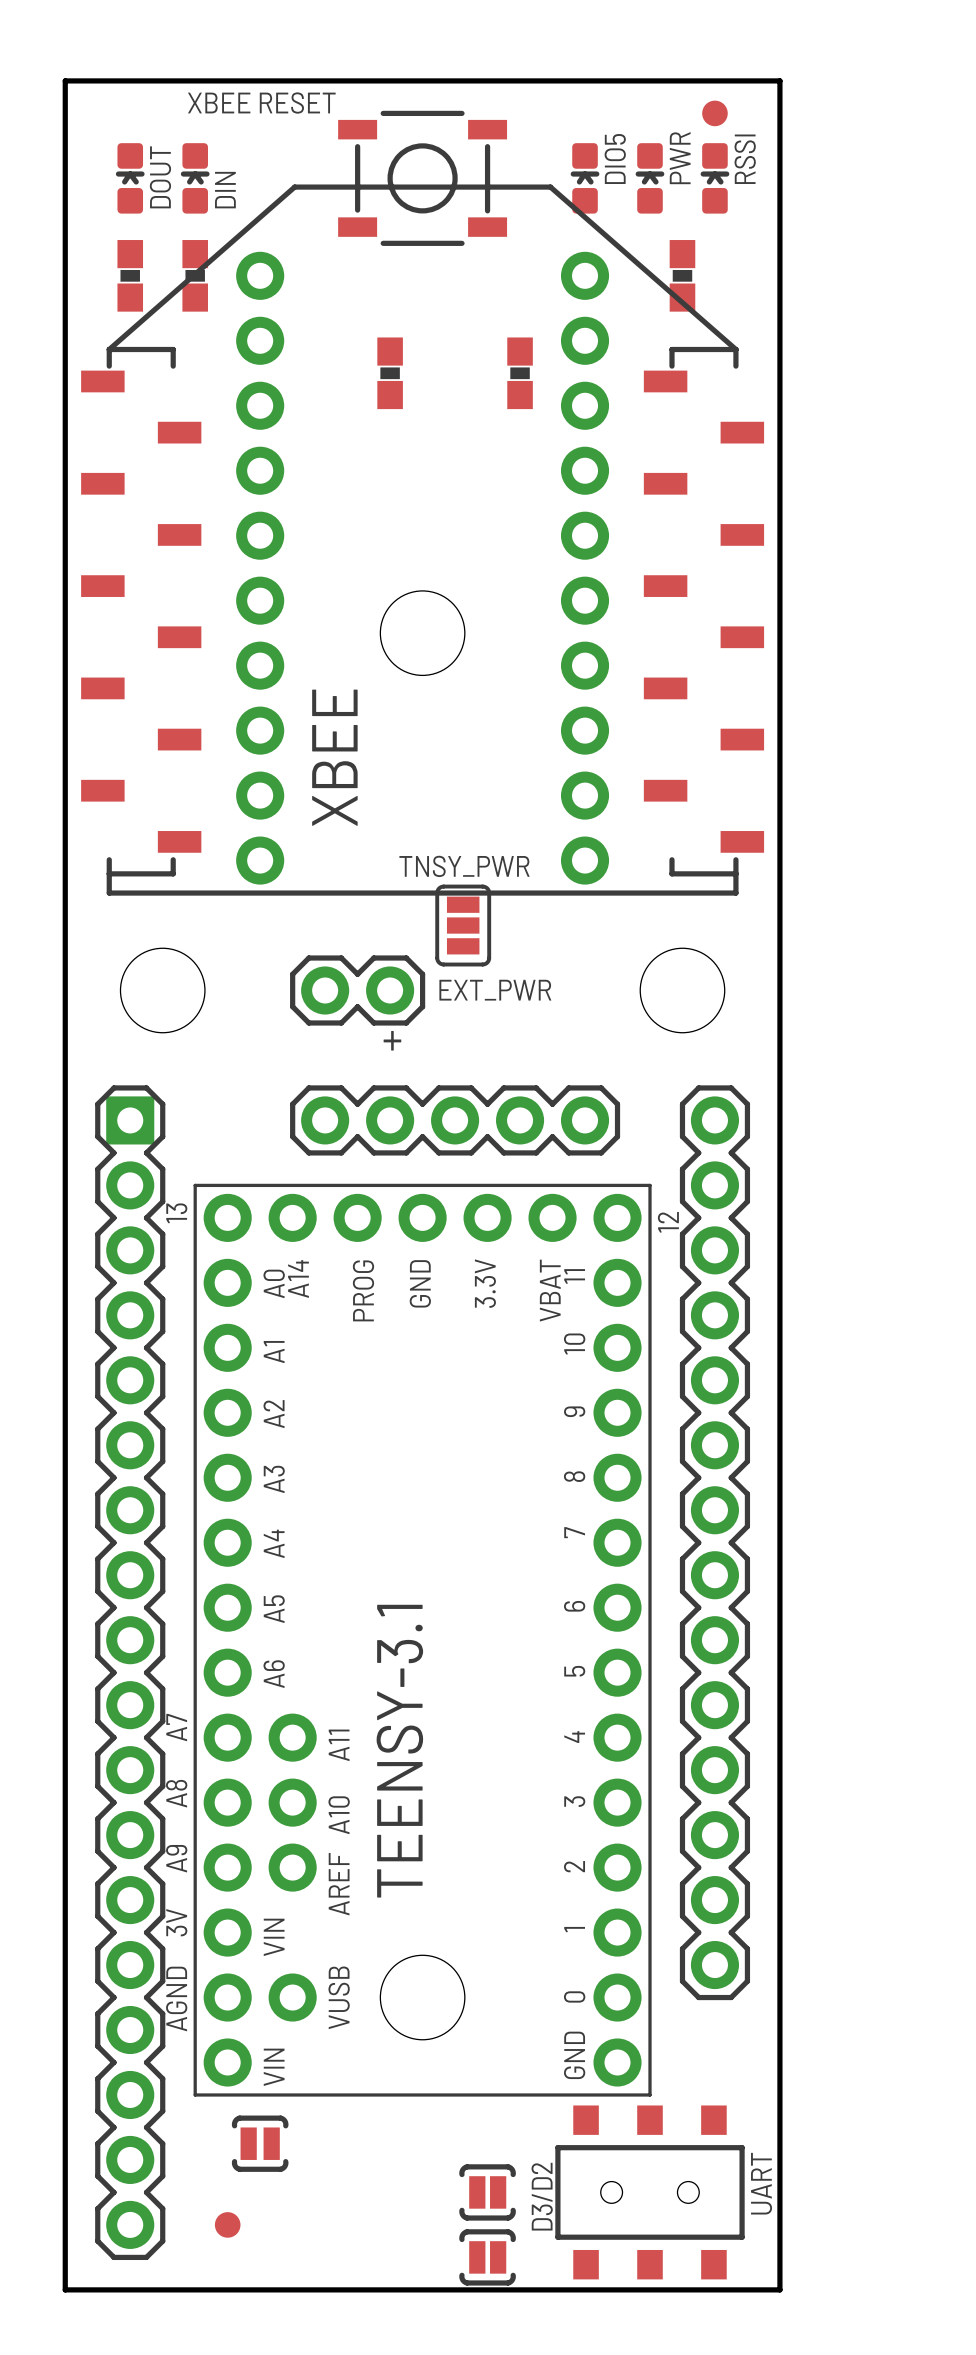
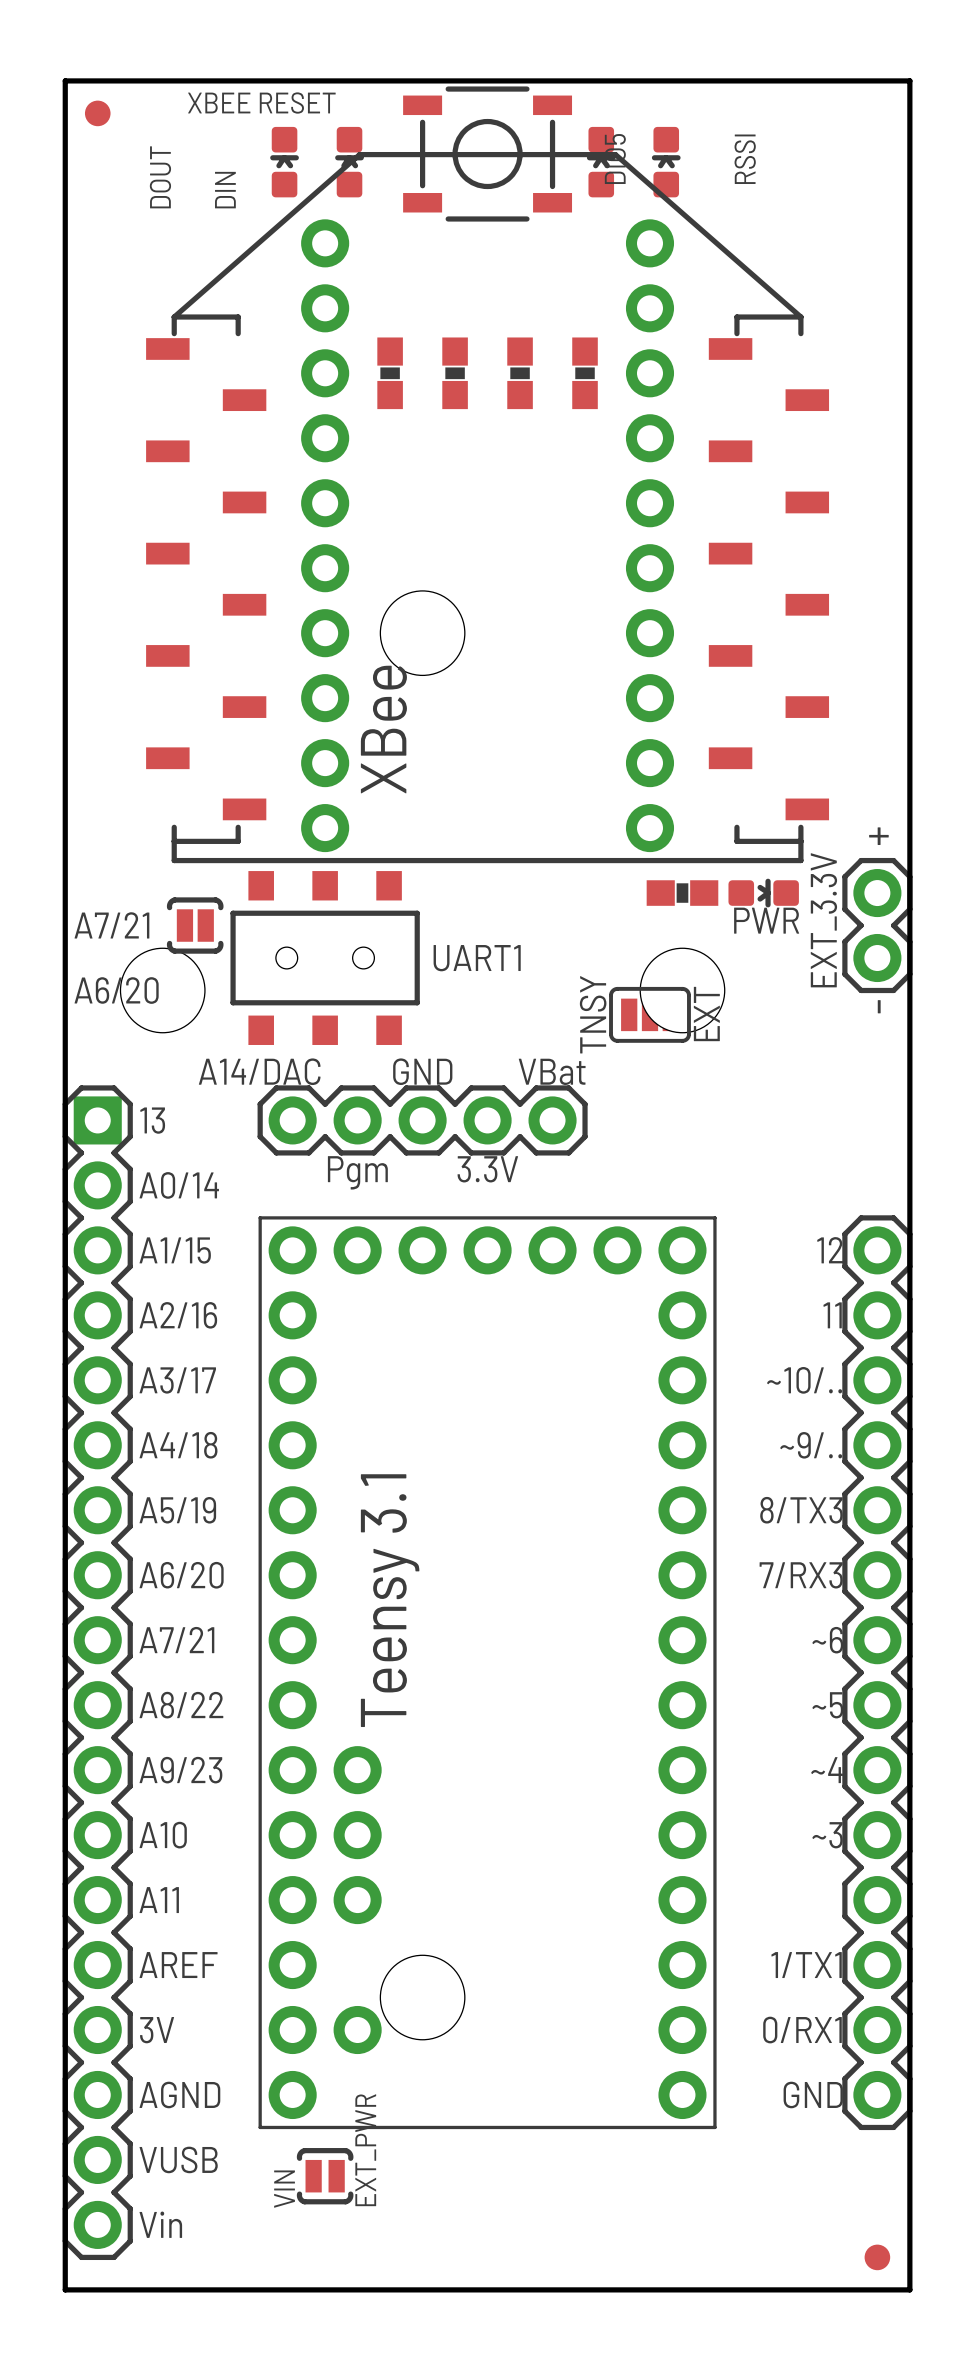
board edge: (779, 80) (779, 2289) -> (779, 80) (909, 80) (909, 2289) (779, 2289)
part position: (714, 113) -> (97, 113)
text: PWR (680, 158) -> none
part: none -> (284, 162)
part: none -> (349, 162)
part: (130, 178) -> none
part: (195, 178) -> none
part position: (422, 178) -> (487, 154)
part position: (585, 178) -> (601, 162)
part position: (649, 178) -> (666, 162)
part: (714, 178) -> none
part: (130, 275) -> none
part: (195, 275) -> none
part: (682, 275) -> none
part: none -> (455, 373)
part: none -> (585, 373)
part position: (422, 540) -> (487, 507)
part position: (260, 568) -> (325, 535)
part position: (585, 568) -> (649, 535)
text: none -> XBee (383, 729)
text: XBEE (334, 757) -> none
text: TNSY_PWR (464, 866) -> none
part: none -> (682, 893)
part: none -> (763, 893)
text: none -> PWR (766, 920)
text: none -> A7/21 (111, 925)
part: none -> (195, 925)
part rotation: 0° (463, 925) -> 90° clockwise (649, 1014)
part position: (463, 925) -> (649, 1014)
EXT_3.3V: none -> (877, 925)
part: none -> (325, 958)
text: none -> UART1 (477, 958)
text: none -> A6/20 (116, 990)
EXT_PWR: (357, 990) -> none
text: none -> - (879, 1006)
text: none -> TNSY (593, 1014)
text: none -> EXT (706, 1014)
text rotation: 0° (392, 1040) -> 90° counterclockwise (878, 836)
text position: + (392, 1040) -> + (878, 836)
text: none -> A14/DAC (259, 1071)
text: none -> GND (422, 1071)
text: none -> VBat (552, 1071)
text: none -> 13 (152, 1120)
part position: (455, 1120) -> (422, 1120)
text: none -> 3.3V (487, 1169)
text: none -> Pgm (357, 1172)
text: none -> A0/14 (179, 1185)
text: none -> A1/15 (175, 1250)
text: none -> 12 (830, 1250)
text: none -> A2/16 (178, 1315)
text: none -> 11 (832, 1315)
text: none -> A3/17 (177, 1380)
text: none -> ~10/.. (804, 1380)
text: none -> A4/18 (178, 1445)
text: none -> ~9/.. (811, 1445)
text: none -> A5/19 (177, 1510)
text: none -> 8/TX3 (801, 1510)
part position: (714, 1542) -> (877, 1672)
text: none -> A6/20 (181, 1575)
text: none -> 7/RX3 (801, 1575)
text: none -> Teensy 3.1 (390, 1600)
text: none -> A7/21 (176, 1640)
part: TEENSY-3.1 (422, 1640) -> none
text: none -> ~6 (827, 1640)
part position: (130, 1672) -> (97, 1672)
part: none -> (487, 1672)
text: none -> A8/22 (181, 1705)
text: none -> ~5 (827, 1705)
text: none -> A9/23 (180, 1770)
text: none -> ~4 (826, 1770)
text: none -> A10 (163, 1835)
text: none -> ~3 (827, 1835)
text: none -> A11 (159, 1900)
text: none -> AREF (178, 1965)
text: none -> 1/TX1 (806, 1965)
text: none -> 3V (157, 2030)
text: none -> 0/RX1 (802, 2030)
text: none -> AGND (179, 2094)
text: none -> GND (813, 2094)
part position: (260, 2143) -> (325, 2176)
text: none -> EXT_PWR (365, 2150)
text: none -> VUSB (178, 2159)
text: UART (761, 2183) -> none
text: none -> VIN (284, 2189)
part: (487, 2192) -> none
part: (649, 2192) -> none
text: D3/D2 (542, 2196) -> none
text: none -> Vin (160, 2224)
part: (227, 2224) -> none
part: (487, 2257) -> none
part: none -> (877, 2257)

